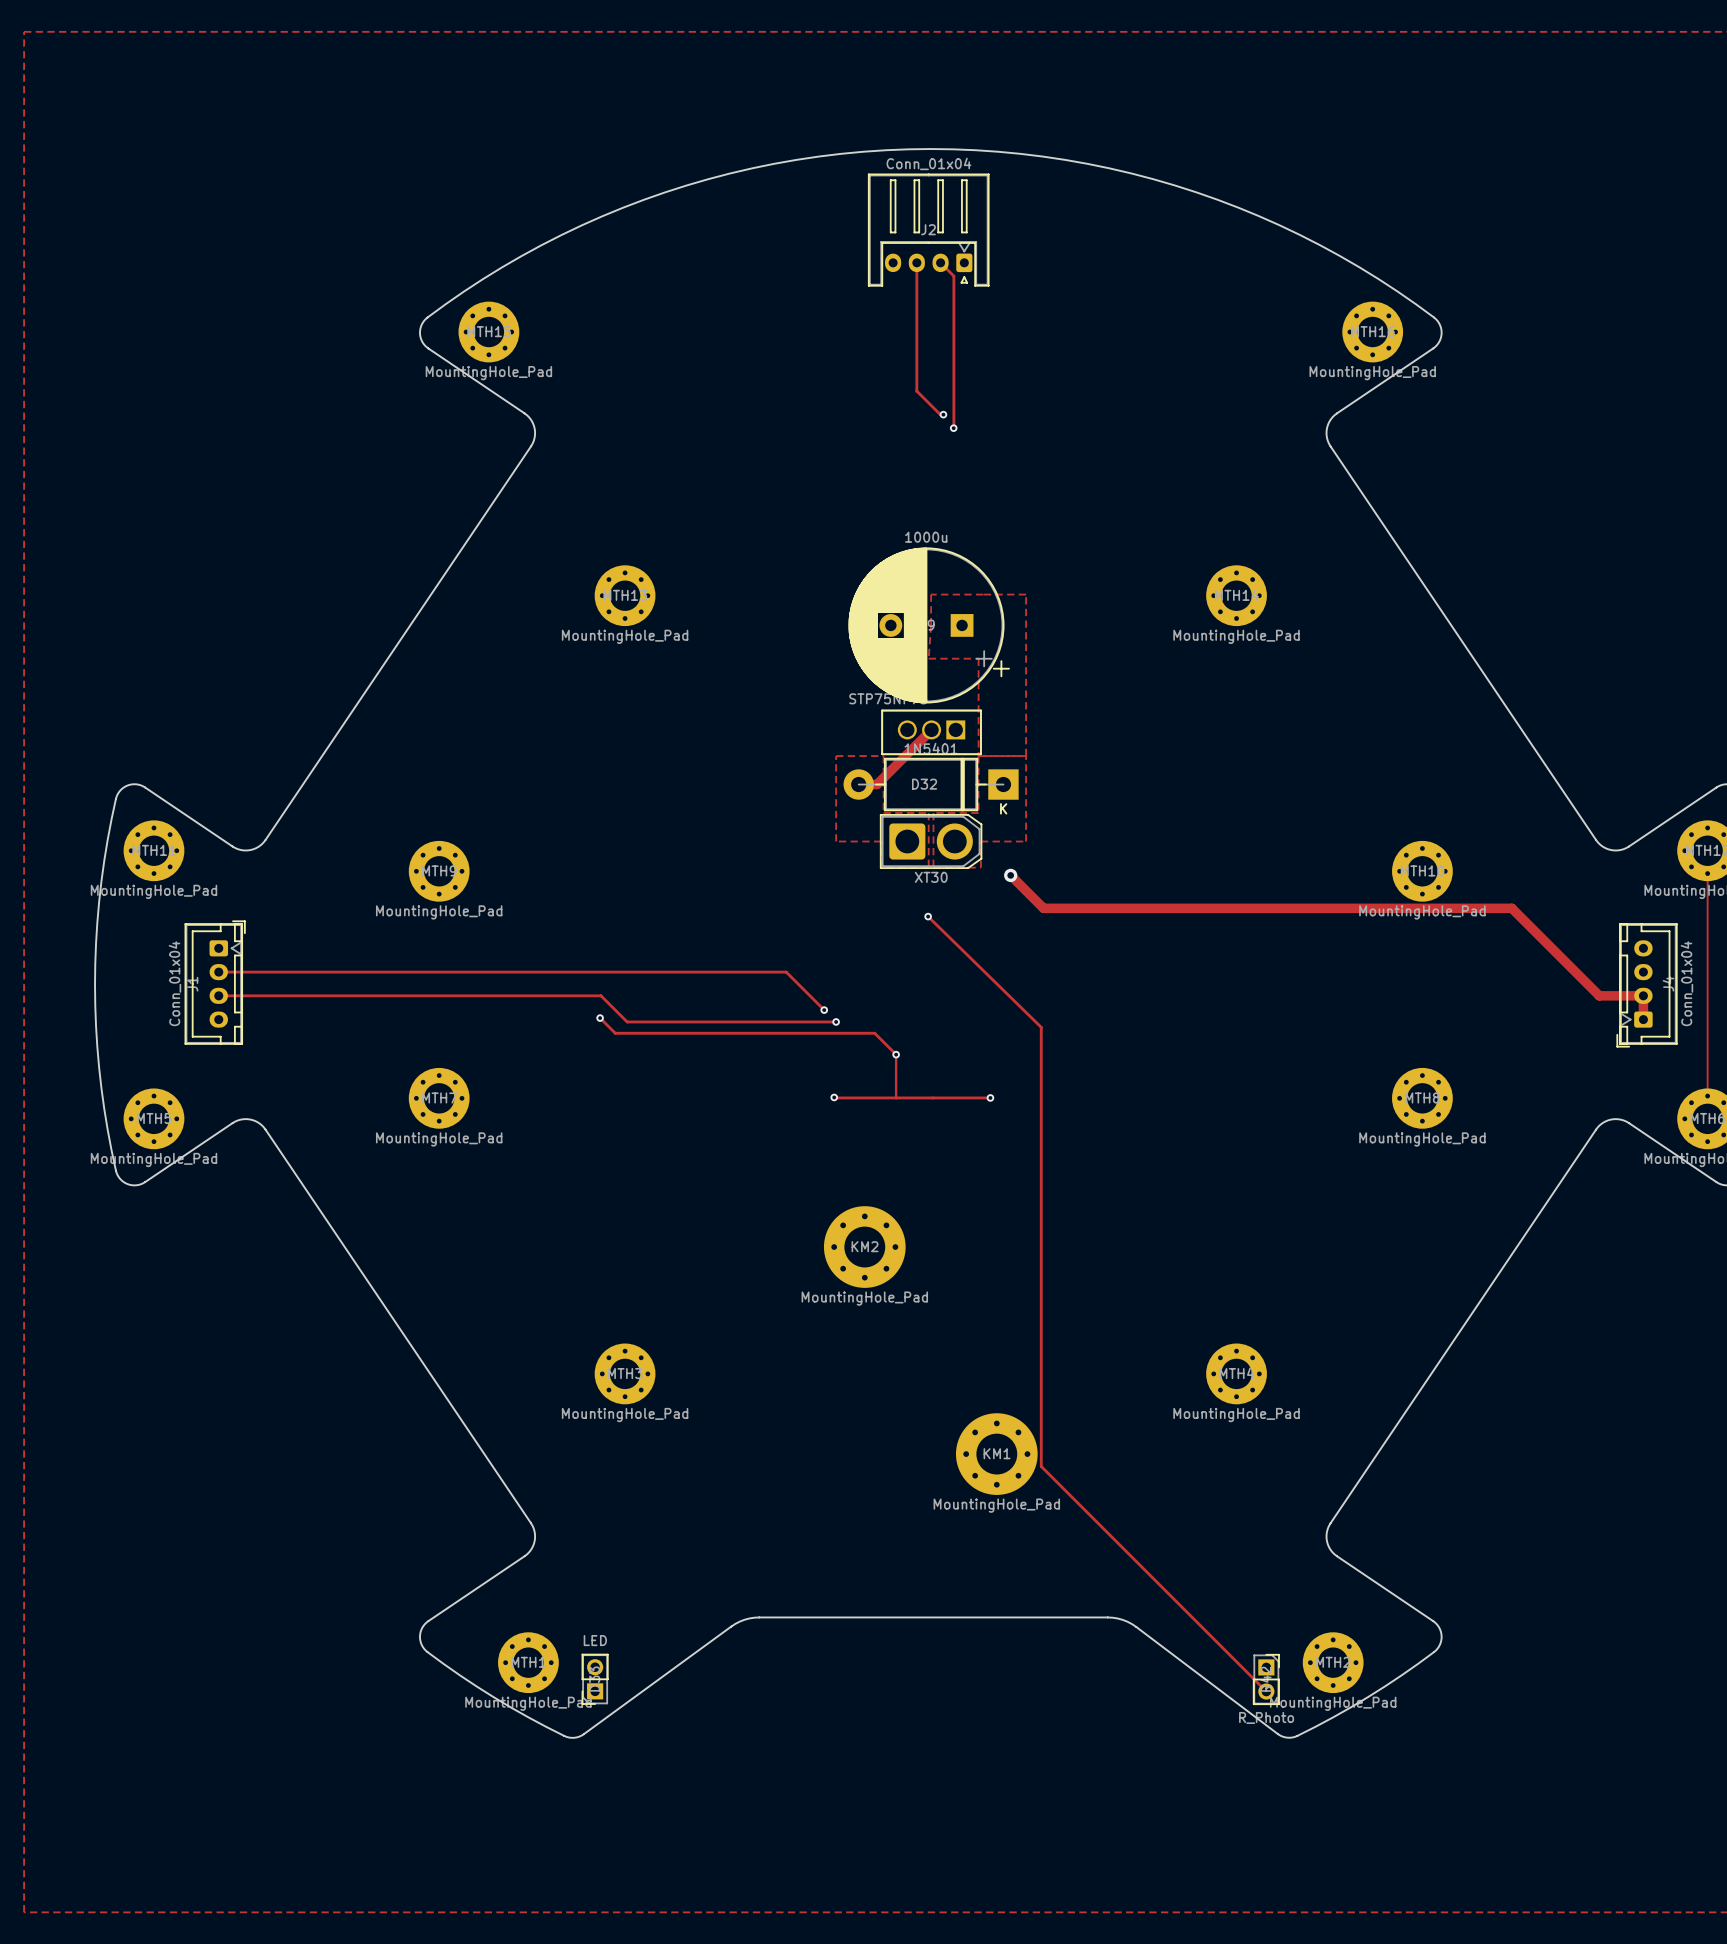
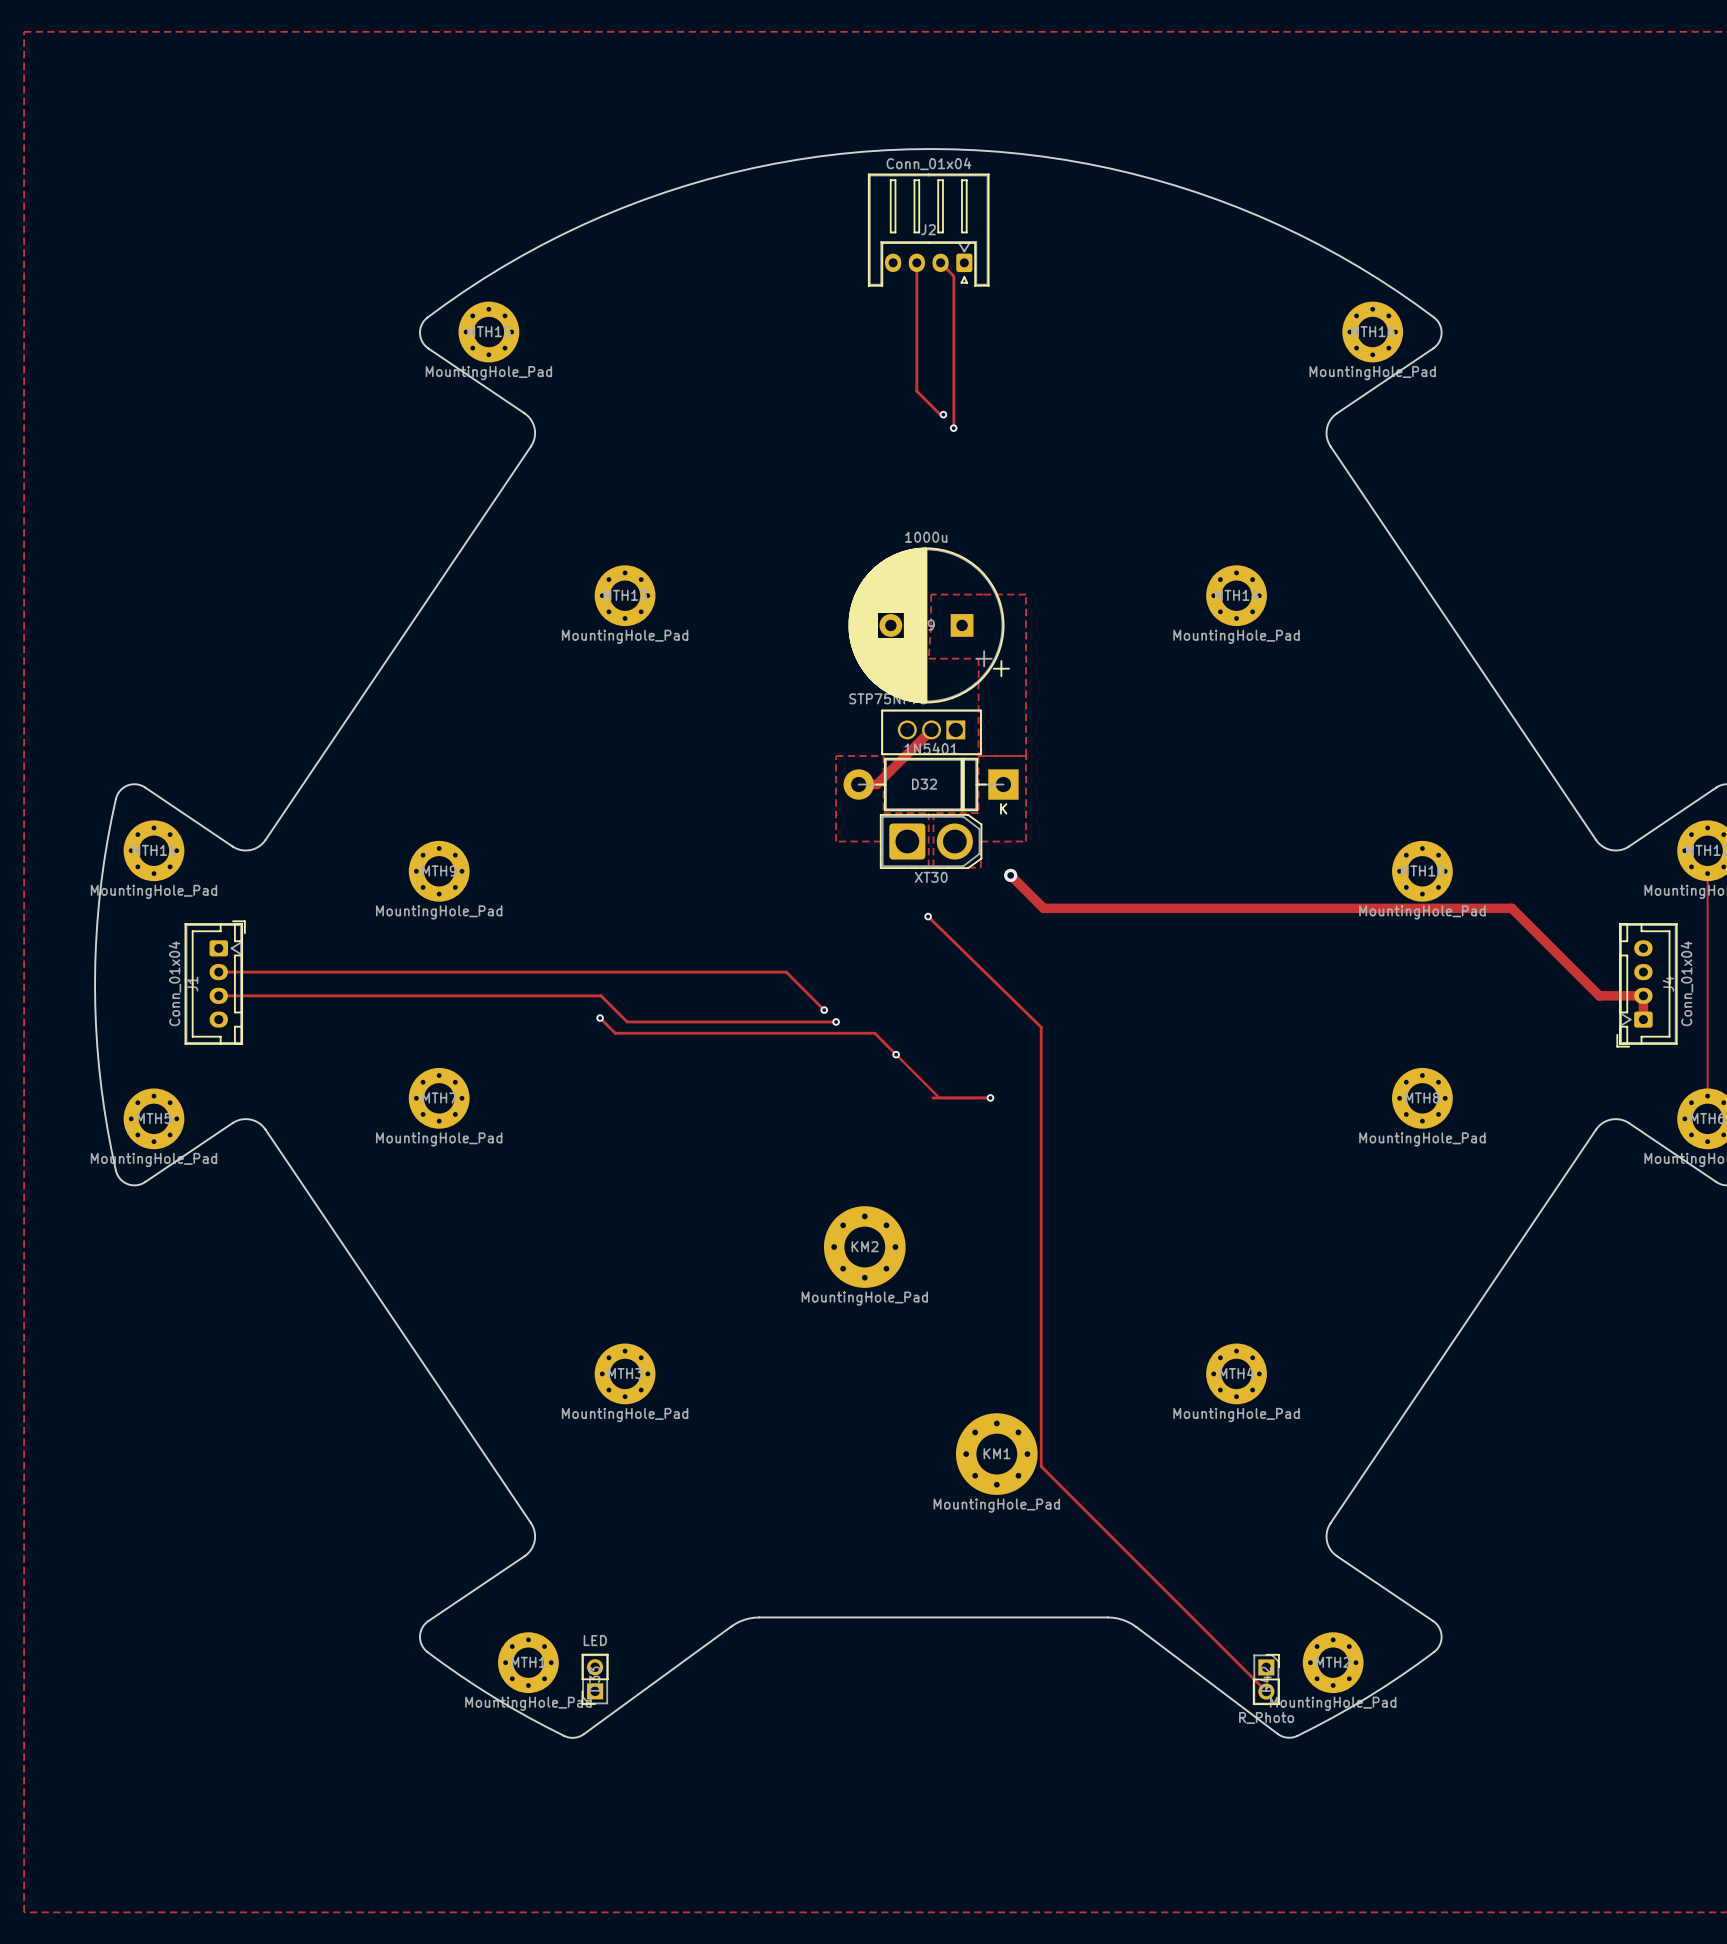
track: (896, 1054) (896, 1097) -> (896, 1054) (939, 1097) (990, 1097)
track: (834, 1097) (932, 1097) -> none
via: (834, 1097) -> none

